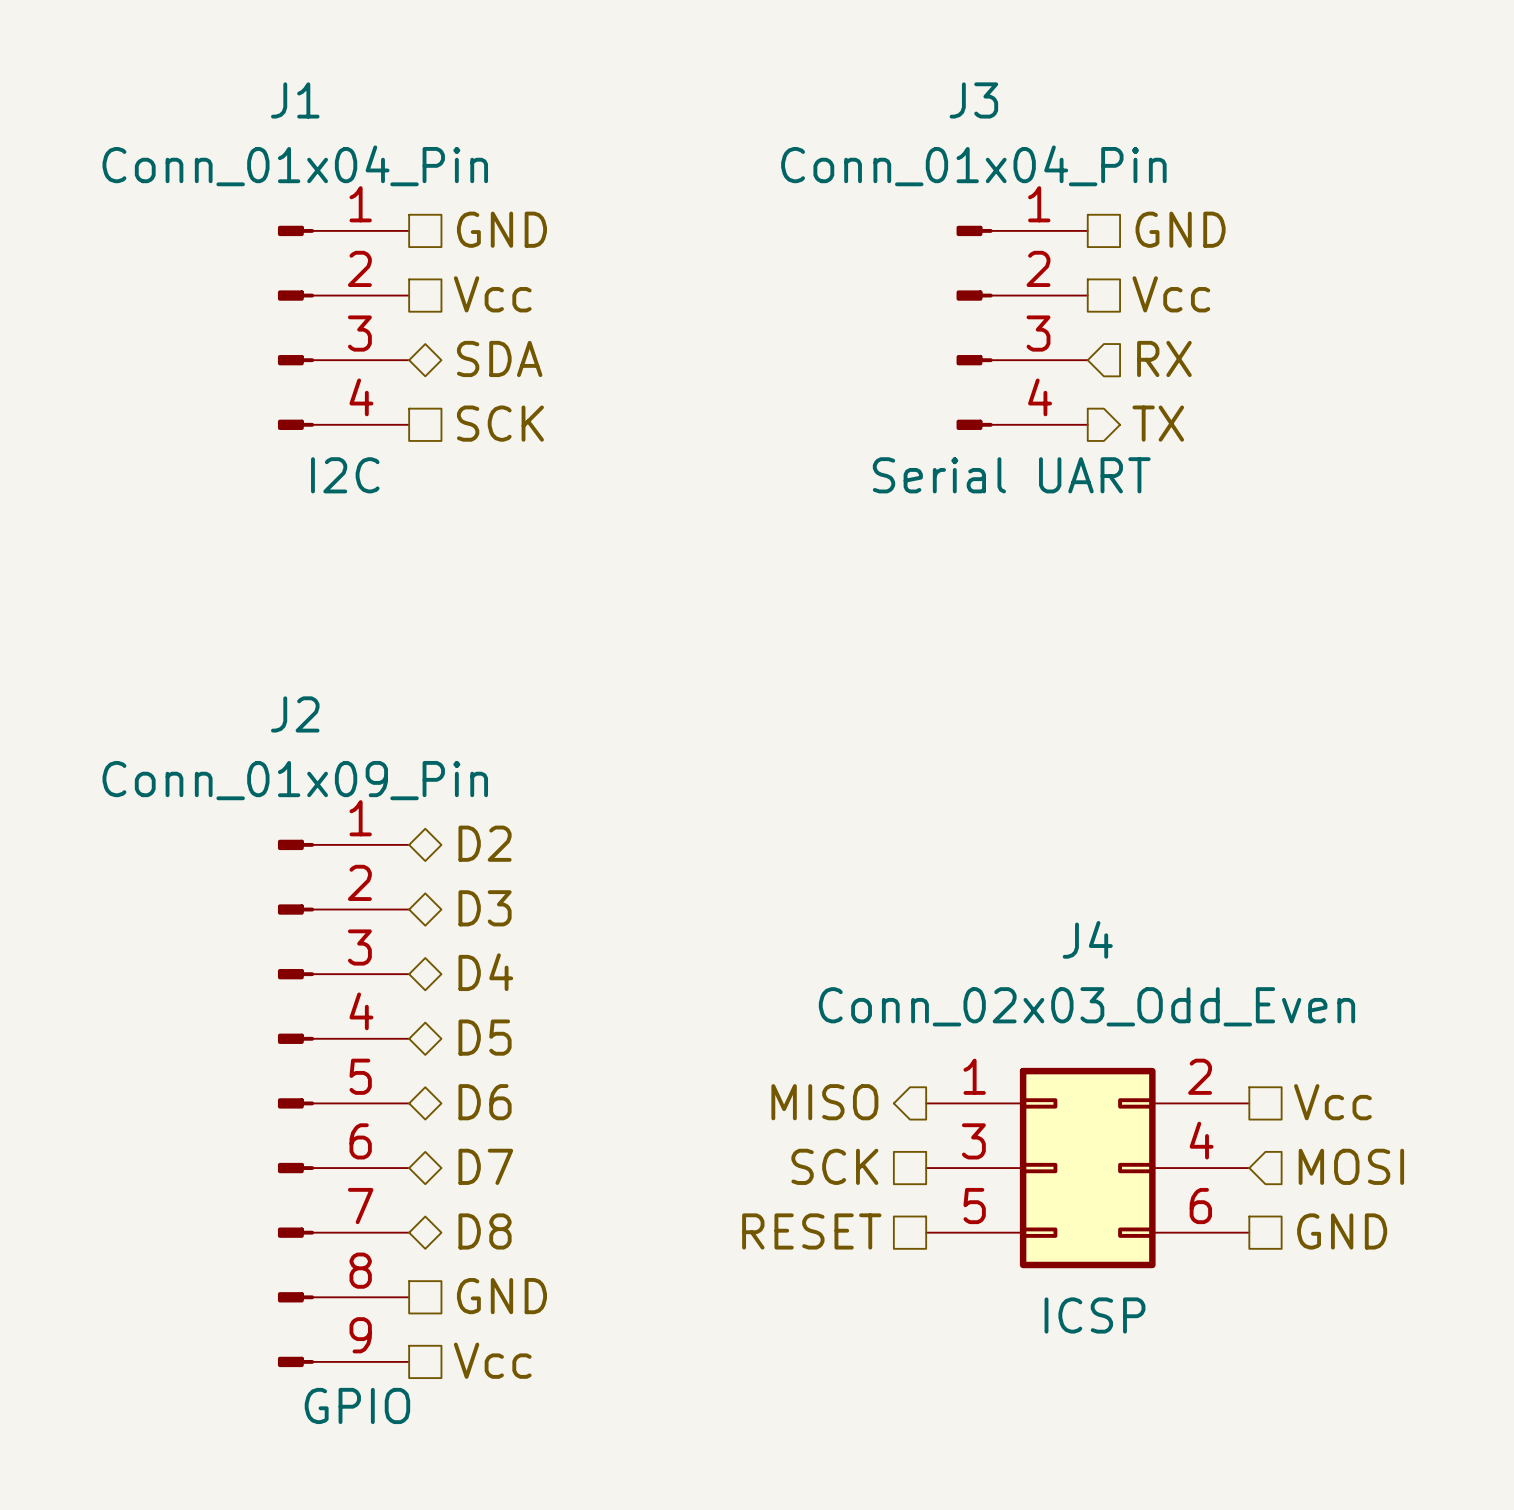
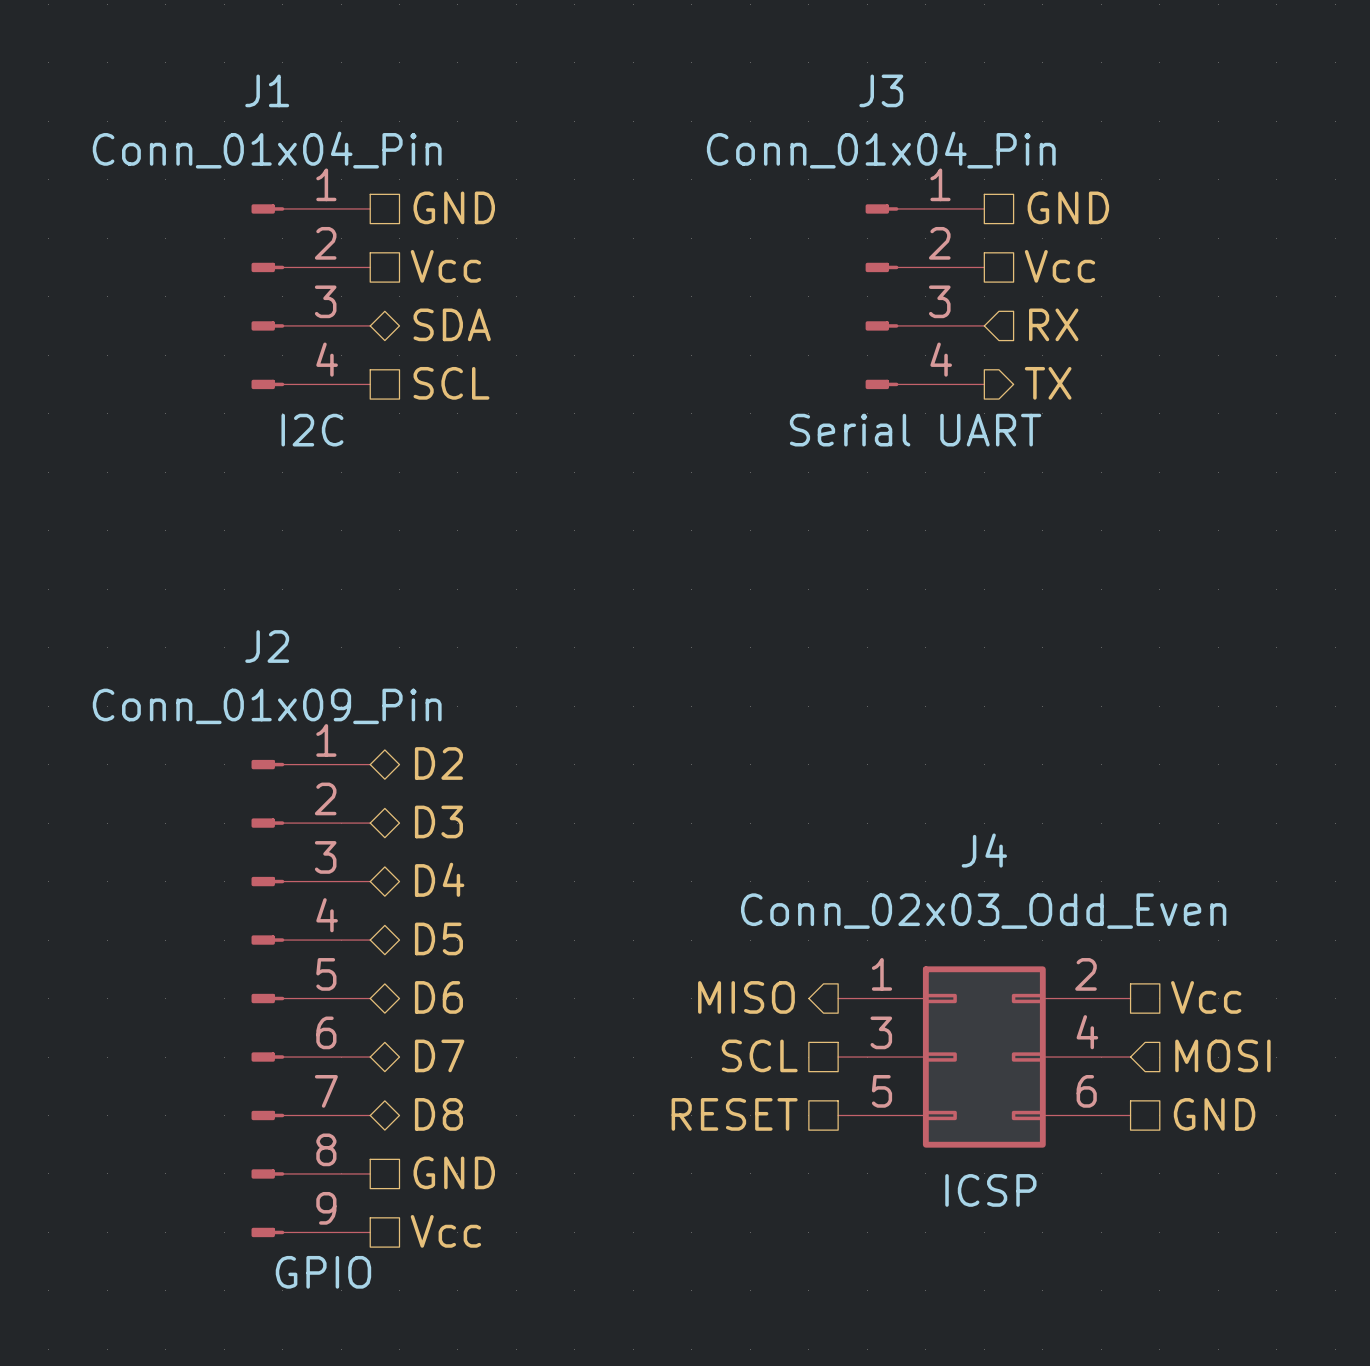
hierarchical label: SCK (500, 423) -> SCL (451, 383)
hierarchical label: SCK (834, 1166) -> SCL (759, 1055)

